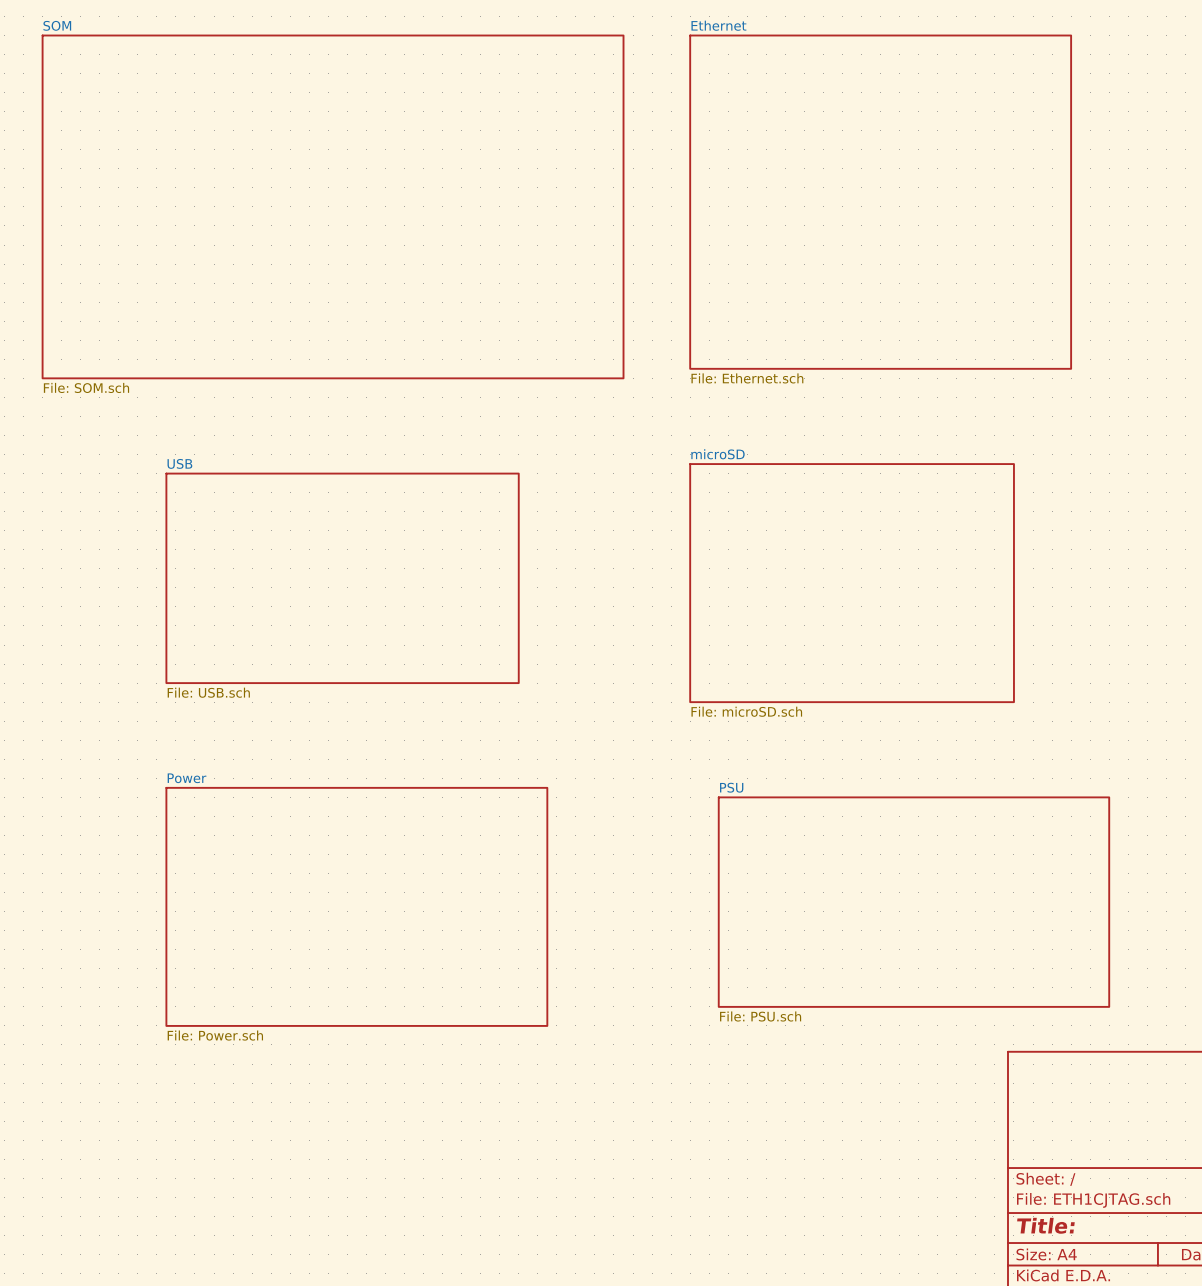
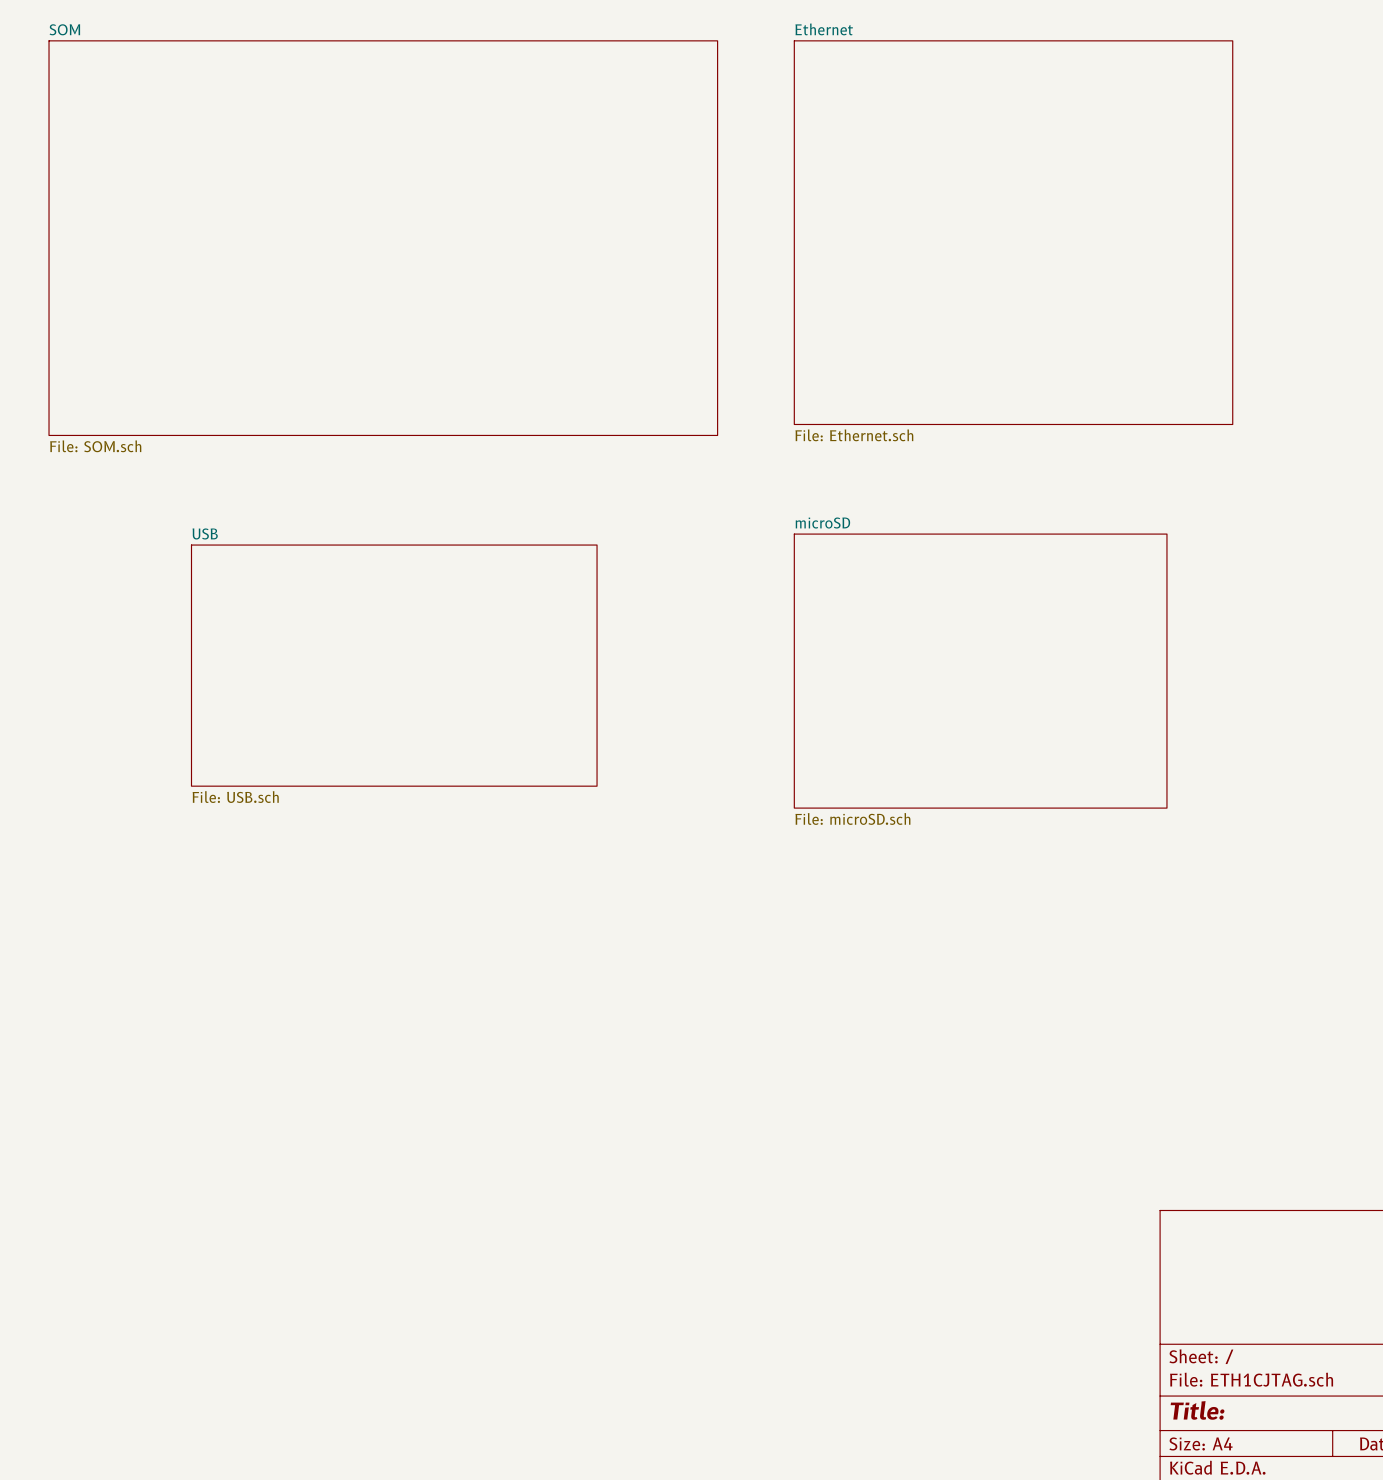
sheet PSU: File: PSU.sch (913, 902) -> none
sheet Power: File: Power.sch (356, 906) -> none

